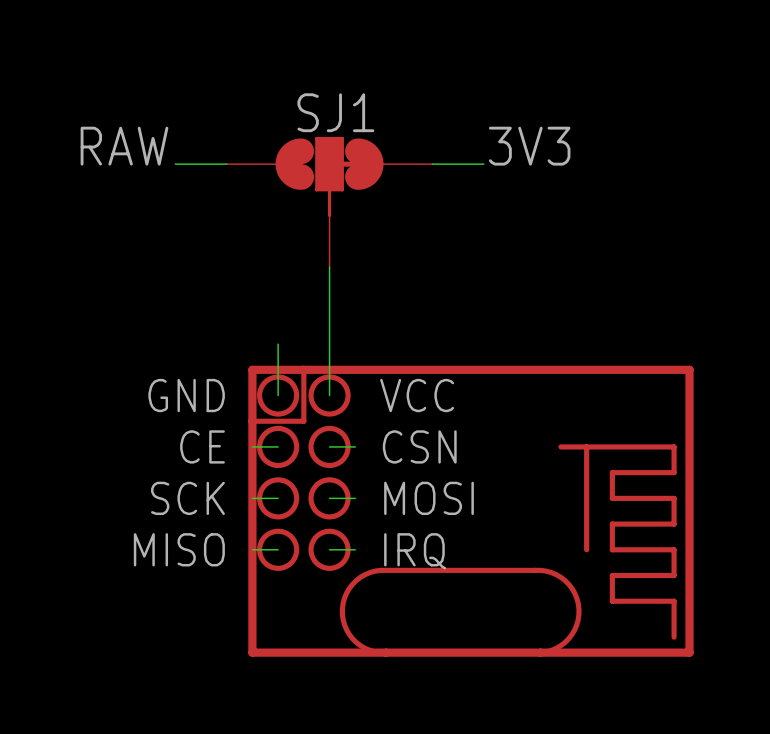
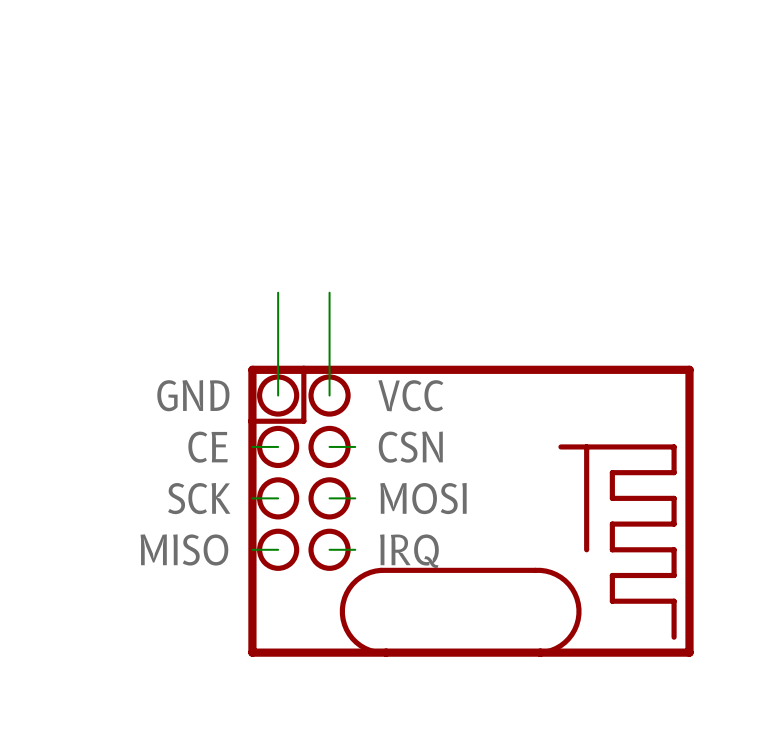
label: RAW (124, 146) -> none
label: 3V3 (529, 146) -> none
wire: (175, 164) (226, 164) -> none
wire: (432, 164) (483, 164) -> none
SJ1: (329, 201) -> none
wire: (329, 266) (329, 292) -> none
wire: none -> (278, 292) (278, 344)

